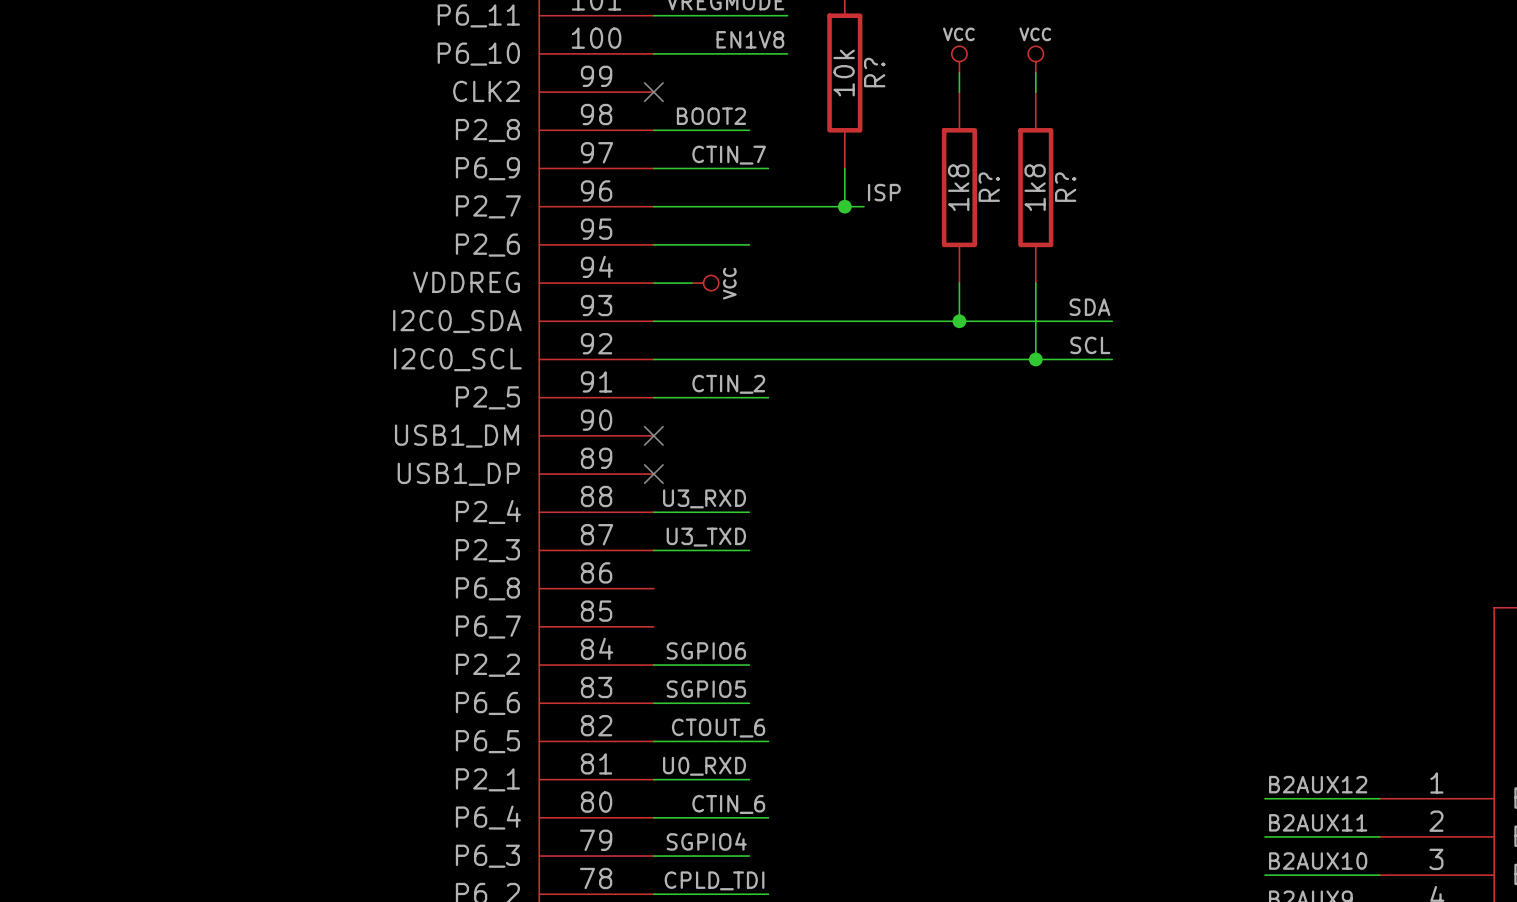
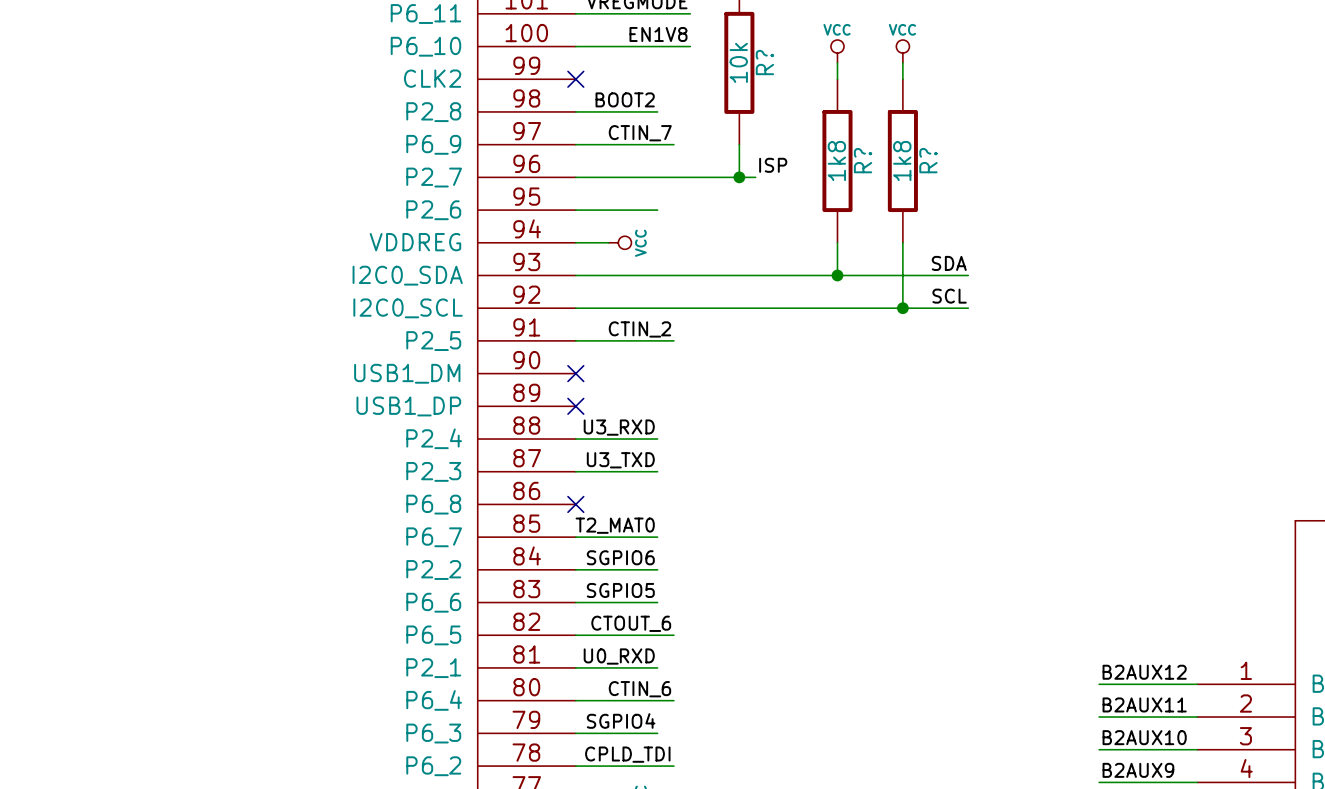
no-connect mark: none -> (575, 504)
label: none -> T2_MAT0 (615, 525)
wire: none -> (575, 537) (657, 537)

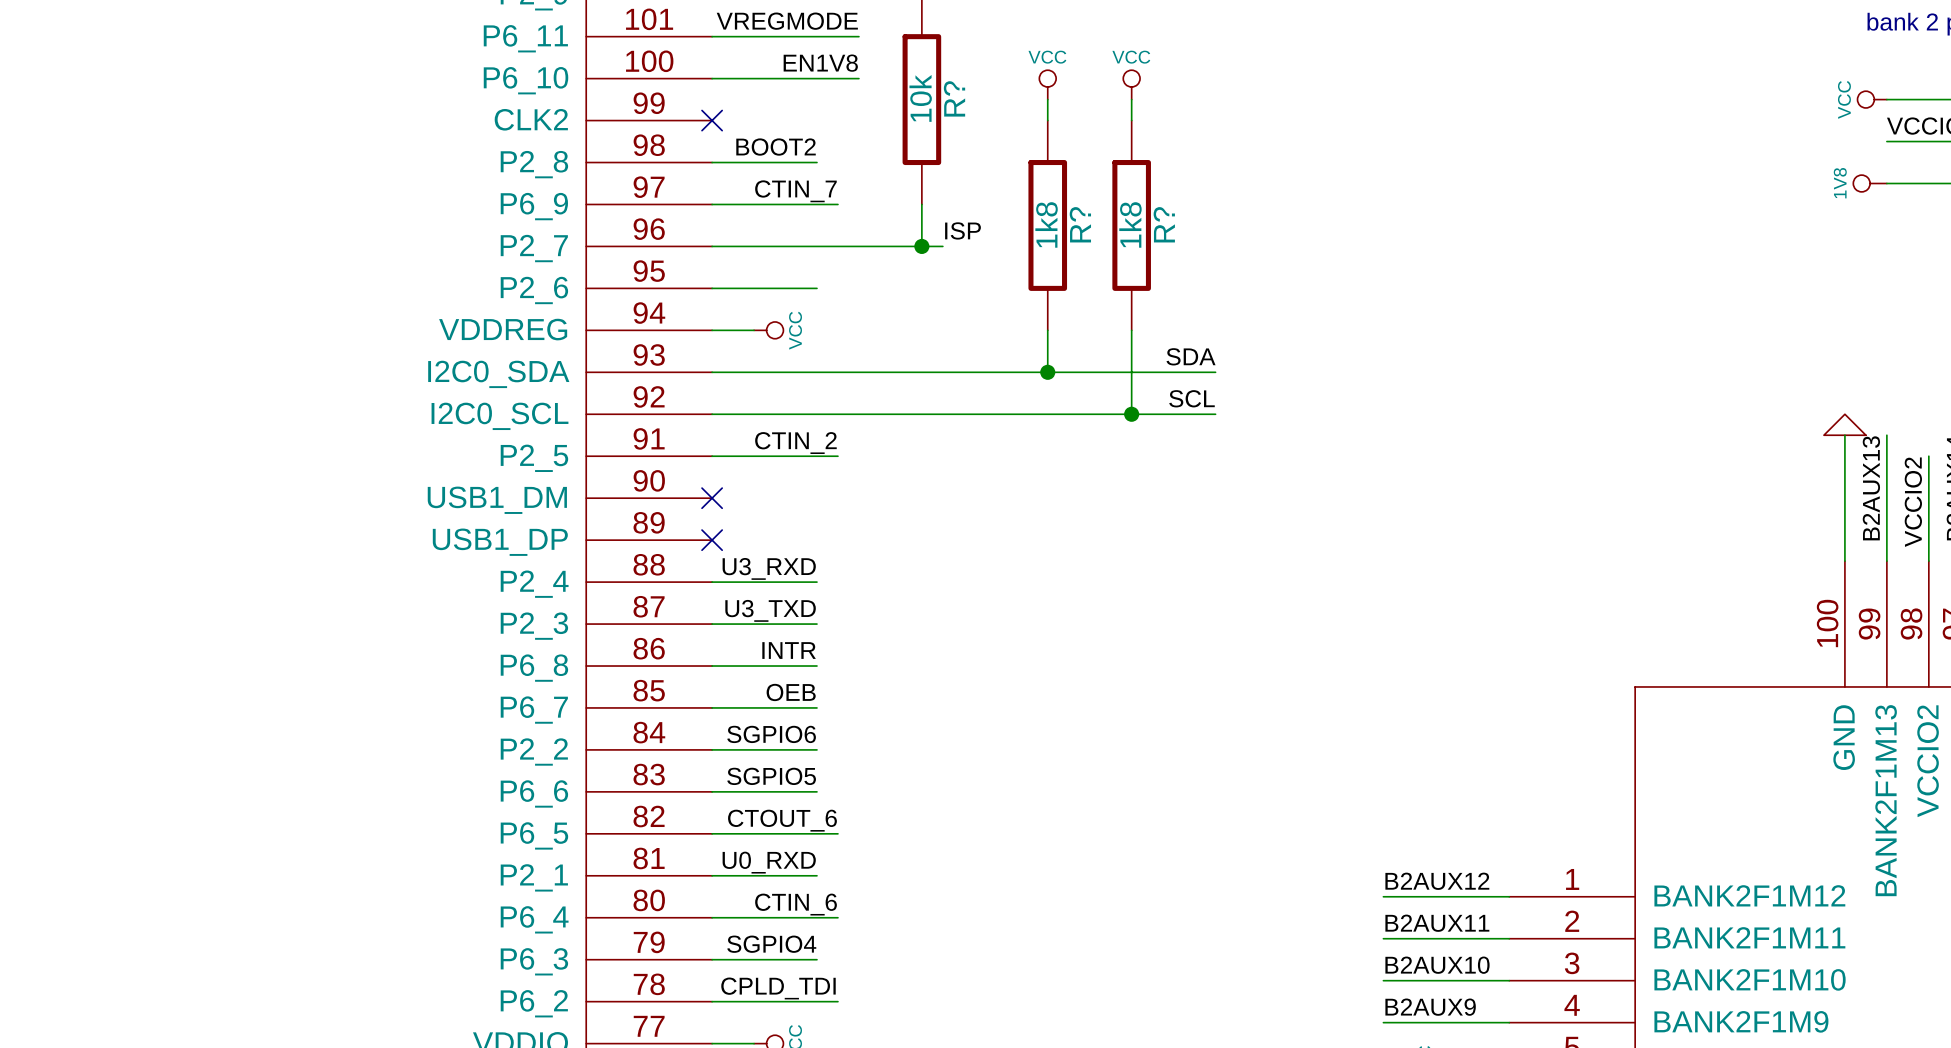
label: none -> INTR (789, 650)
wire: none -> (712, 666) (816, 666)
no-connect mark: (575, 504) -> none
label: T2_MAT0 (615, 525) -> OEB (791, 692)

